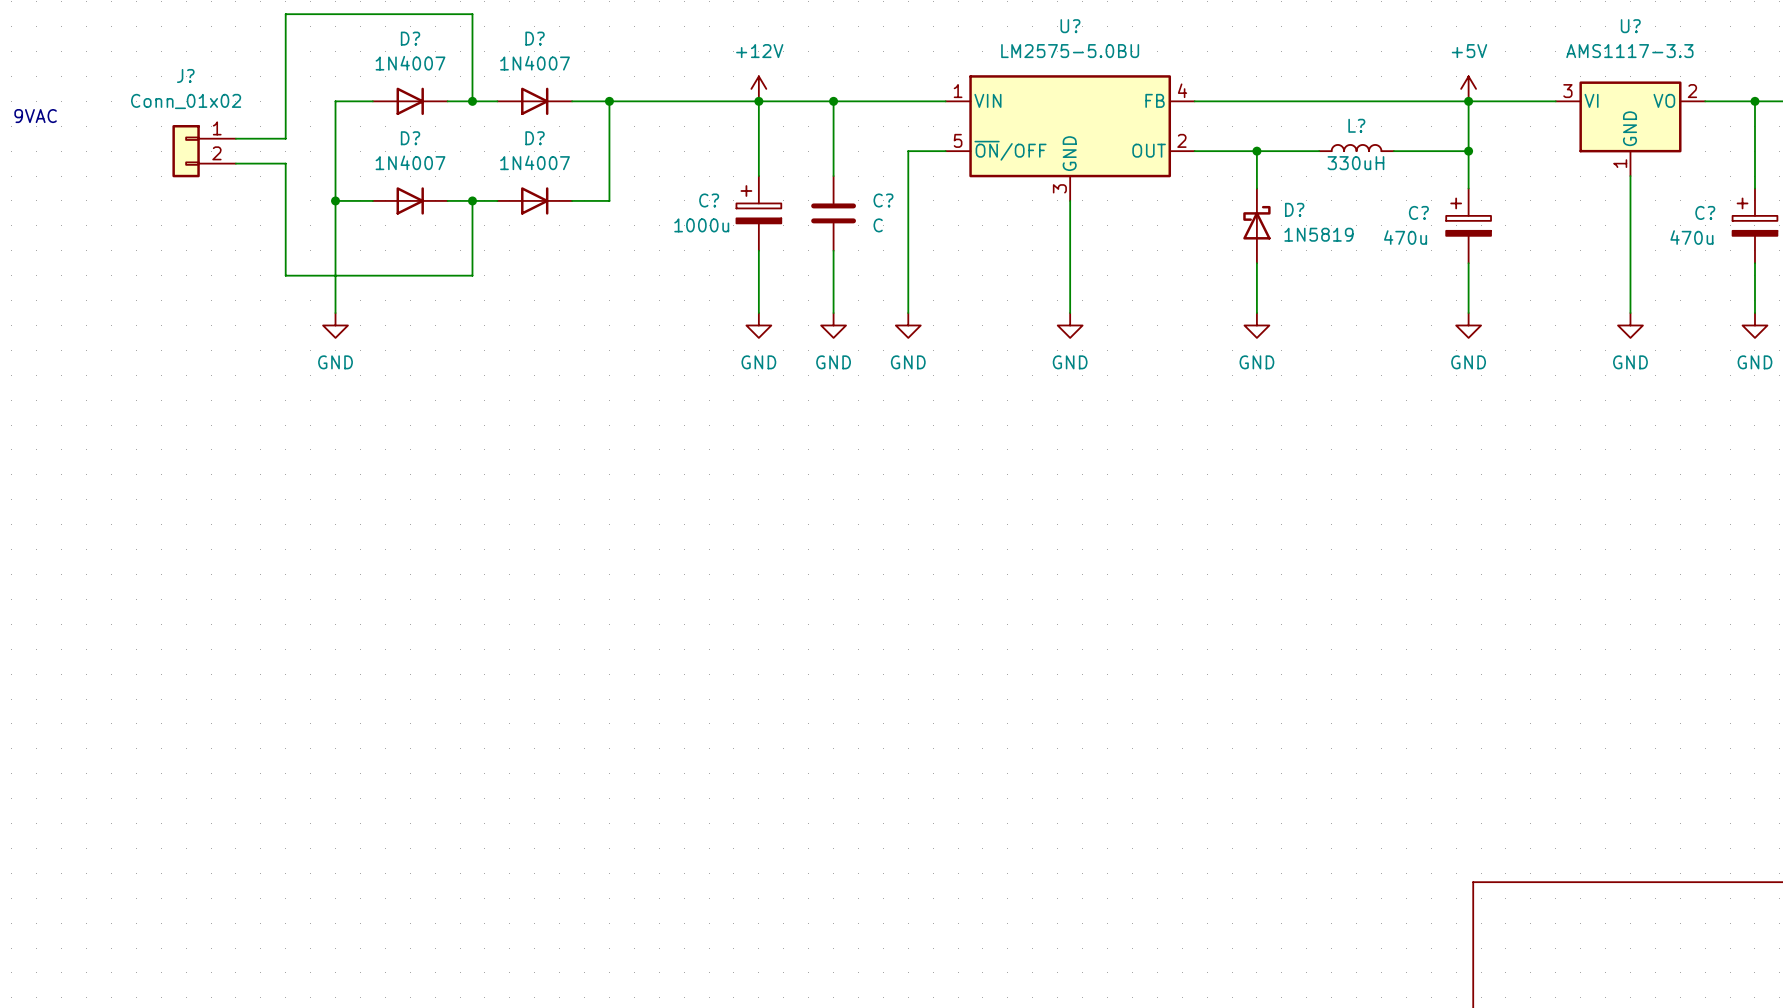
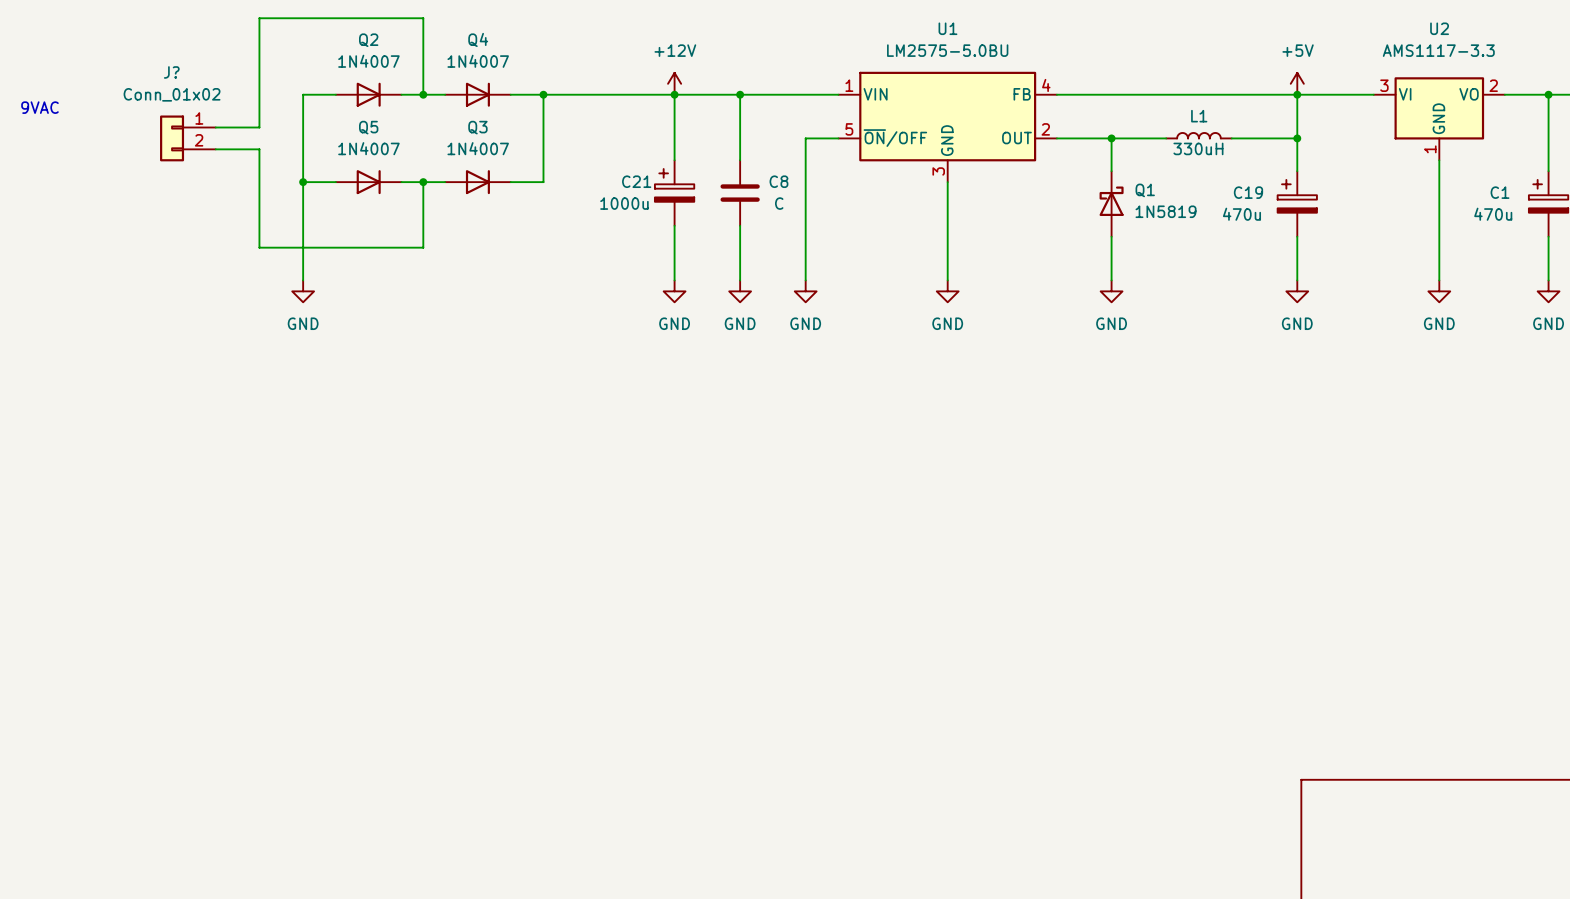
U? name: U? (1070, 26) -> U1 (947, 28)
U? name: U? (1630, 26) -> U2 (1439, 28)
D? name: D? (410, 38) -> Q2 (368, 40)
D? name: D? (535, 38) -> Q4 (478, 39)
L? name: L? (1356, 125) -> L1 (1199, 116)
D? name: D? (410, 138) -> Q5 (368, 127)
D? name: D? (535, 138) -> Q3 (477, 127)
C? name: C? (709, 200) -> C21 (636, 181)
C? name: C? (883, 200) -> C8 (778, 181)
D? name: D? (1294, 209) -> Q1 (1145, 190)
C? name: C? (1418, 212) -> C19 (1248, 192)
C? name: C? (1705, 212) -> C1 (1500, 192)

